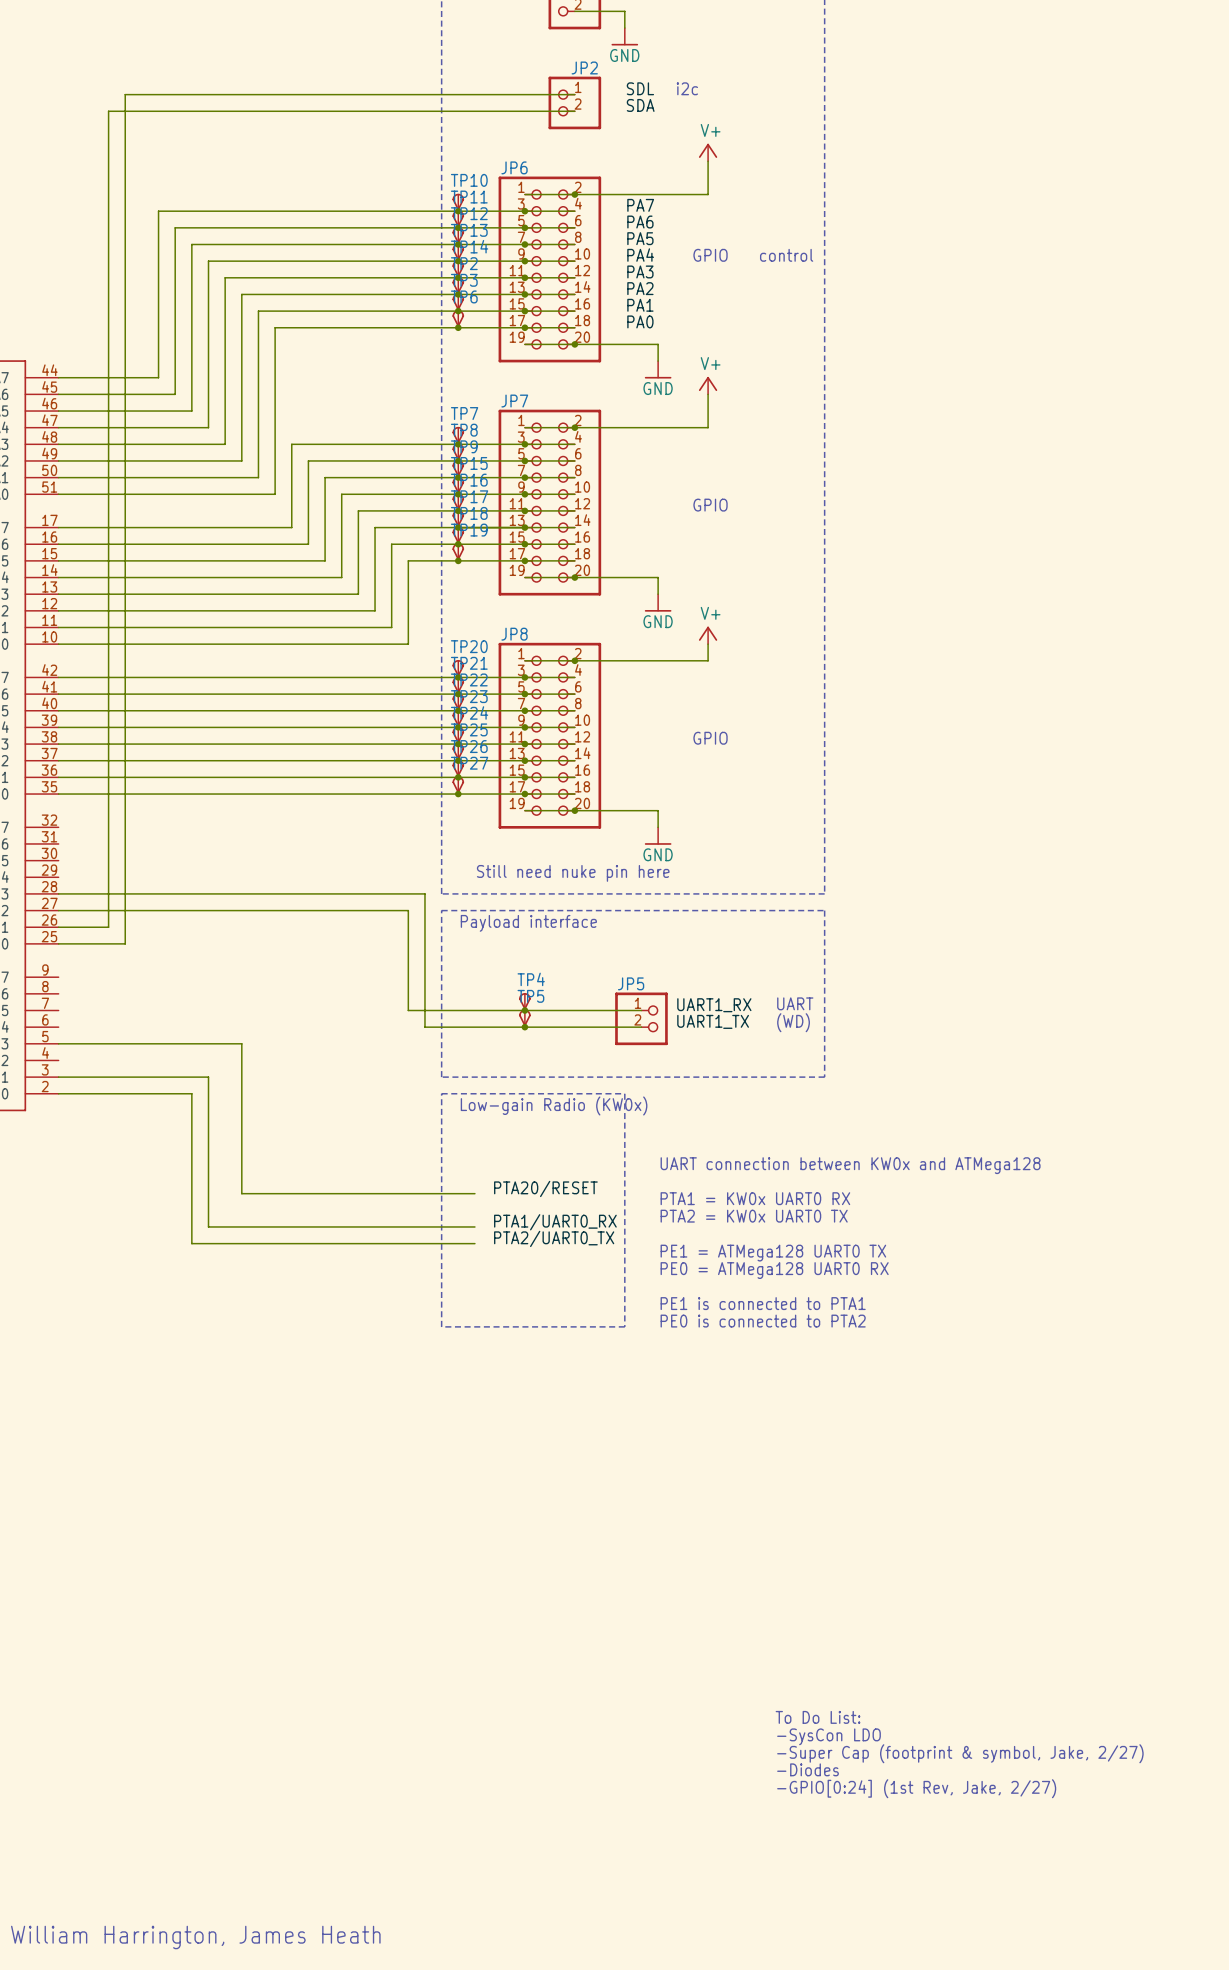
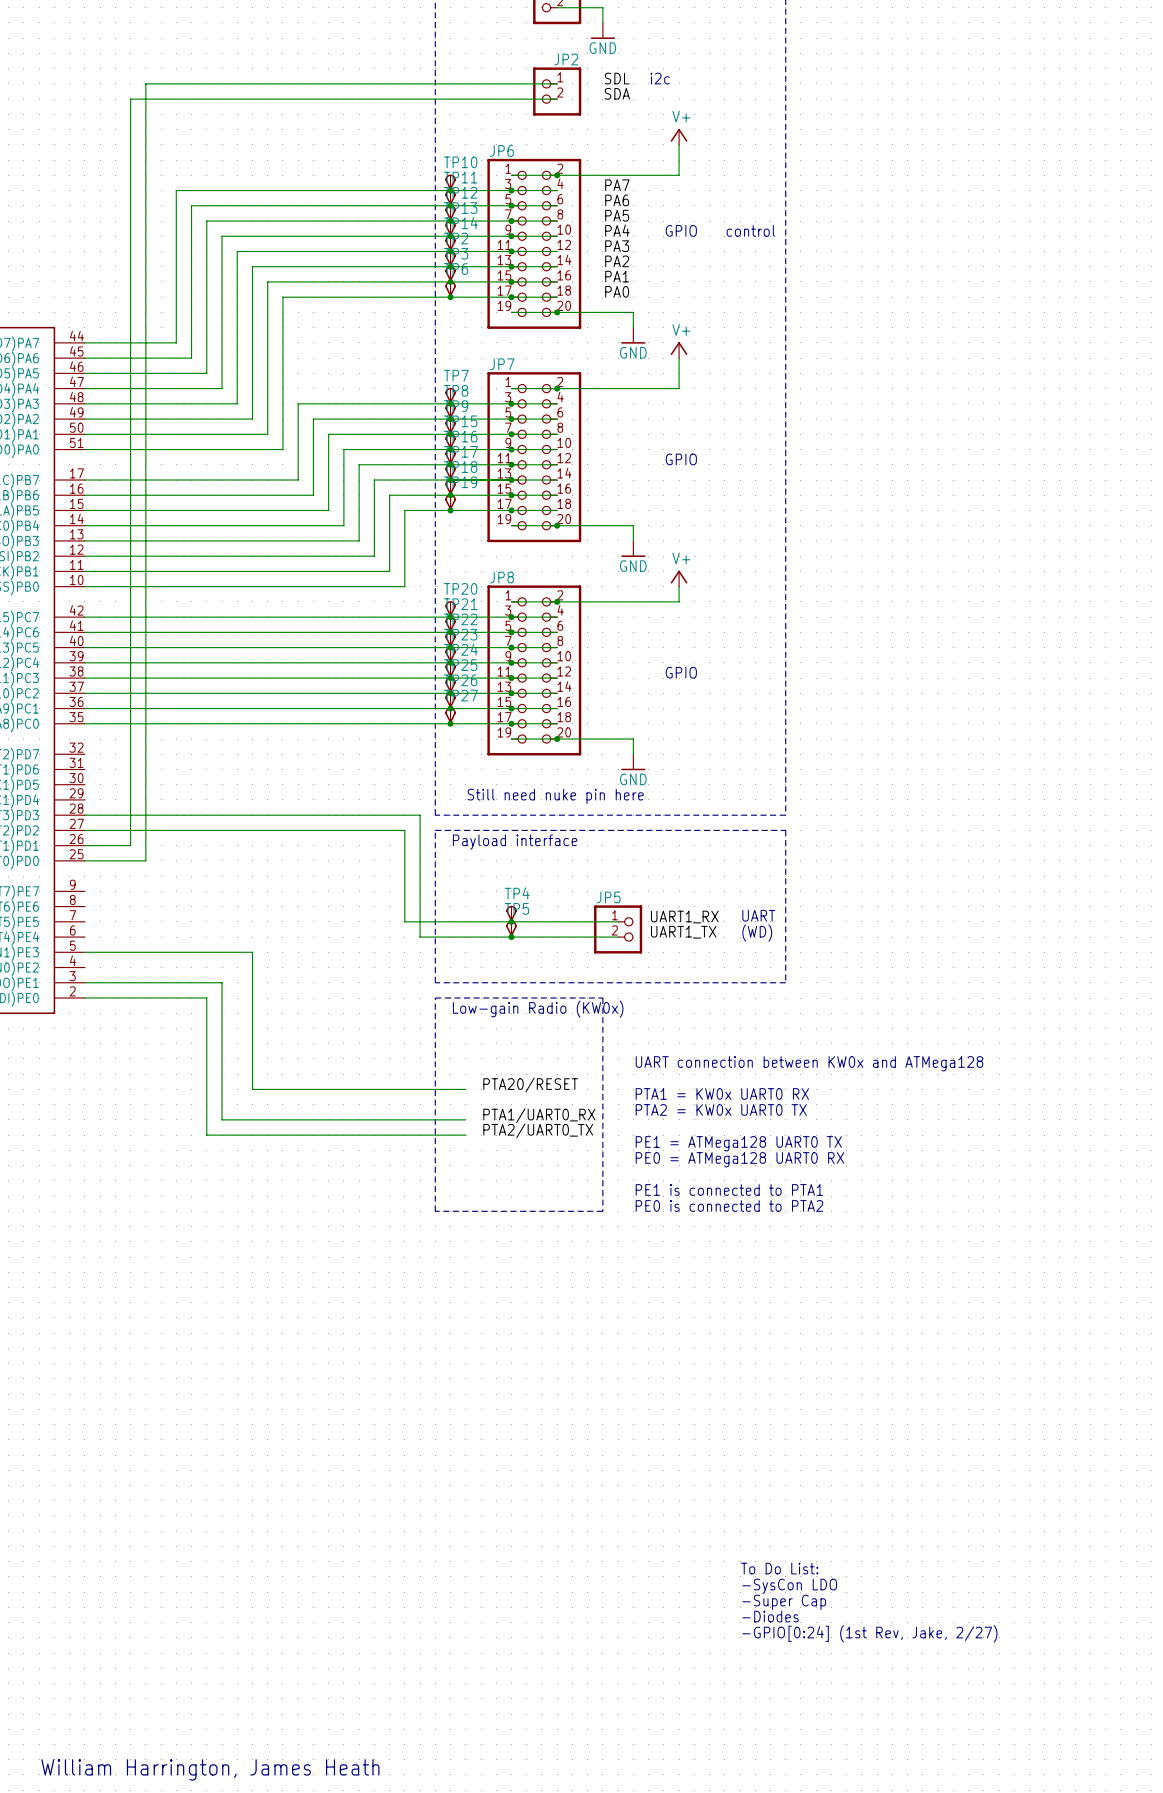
text: -Super Cap (footprint & symbol, Jake, 2/27) (960, 1753) -> -Super Cap (784, 1602)

